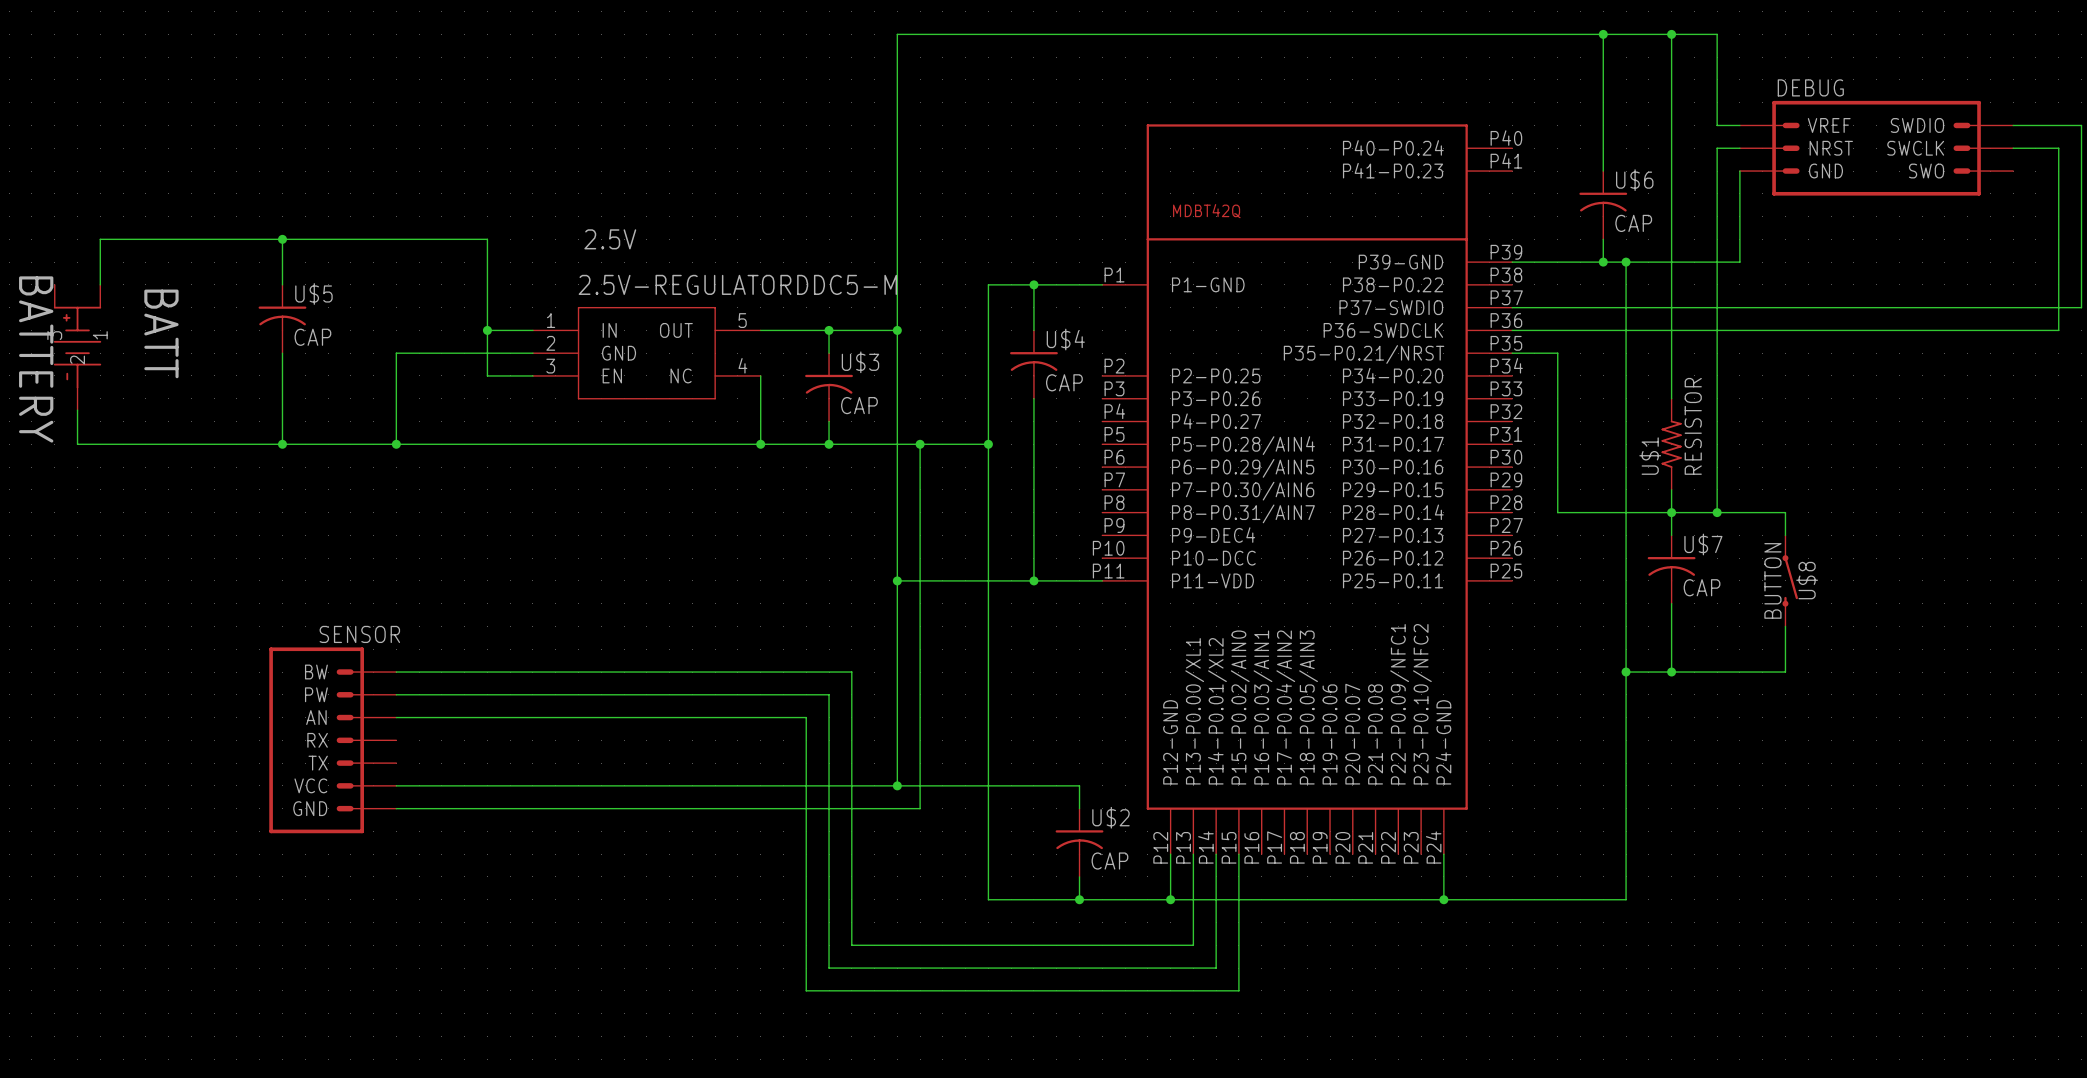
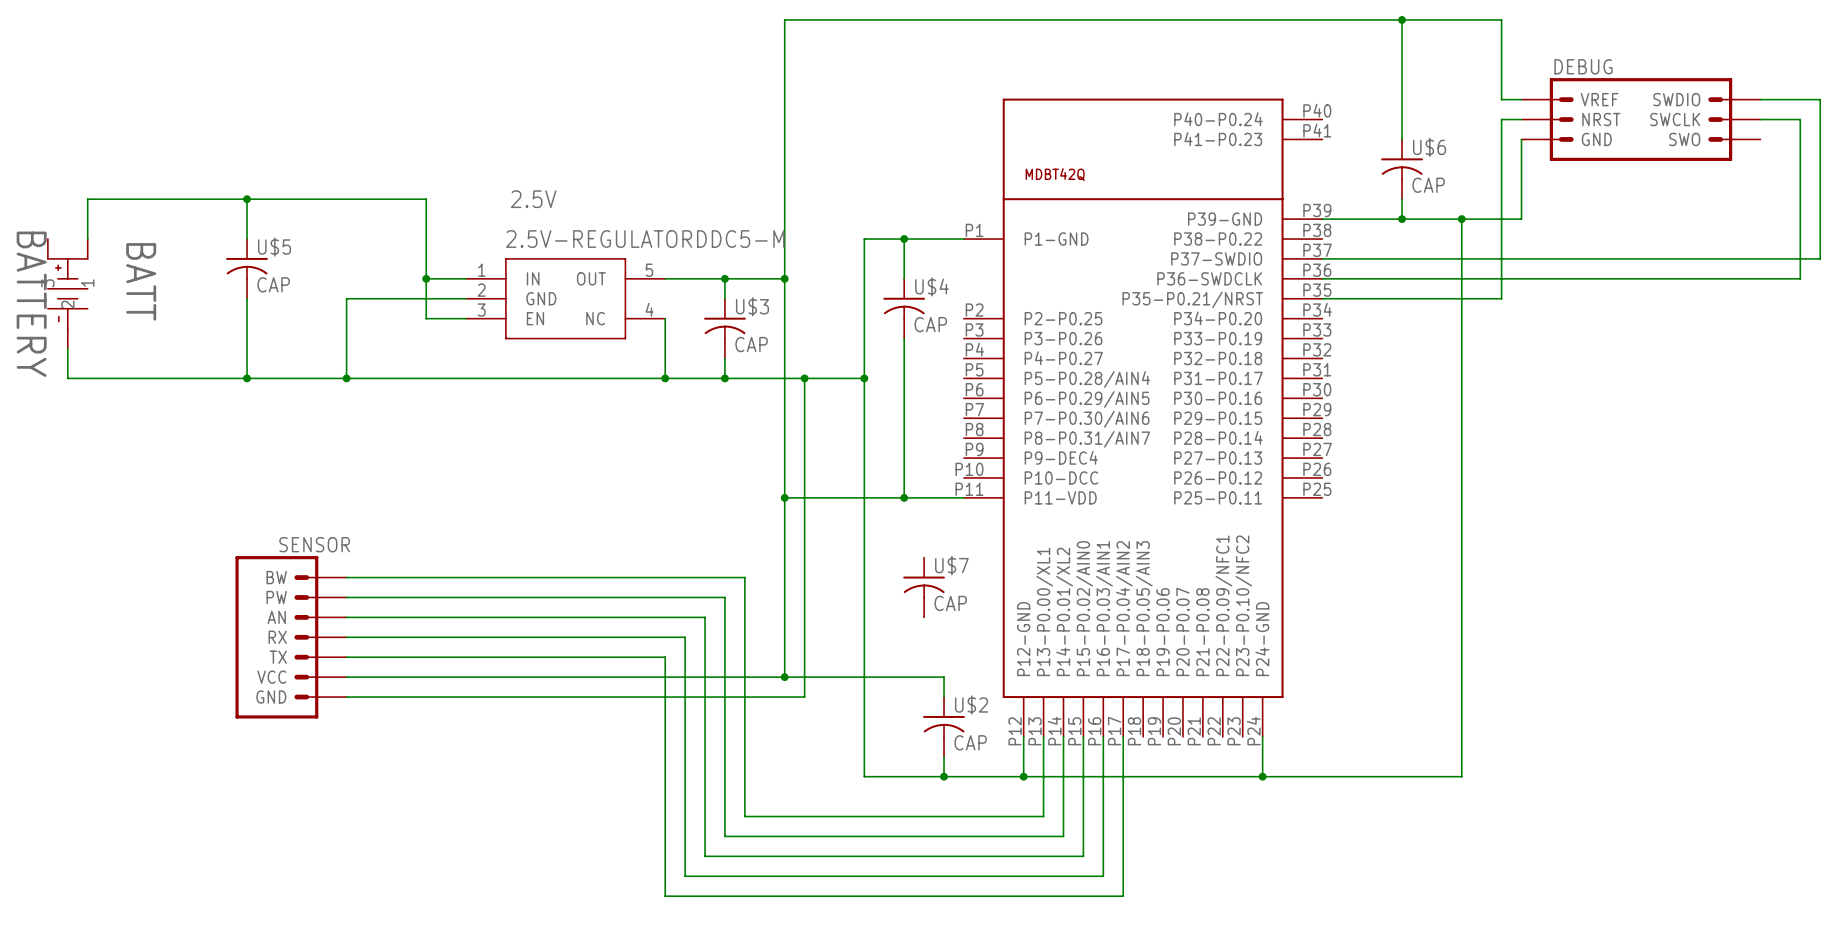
wire: (1671, 34) (1671, 262) -> none
junction: (1671, 34) -> none
wire: (1626, 262) (1626, 899) -> (1461, 577) (1461, 776) (1421, 776)
junction position: (1626, 262) -> (1461, 219)
wire: (1557, 353) (1557, 512) (1785, 512) (1785, 535) -> (1362, 298) (1501, 298)
wire: (1717, 353) (1717, 512) -> none
U$1: RESISTOR (1671, 444) -> none
junction: (1671, 512) -> none
junction: (1717, 512) -> none
U$7 position: (1671, 569) -> (924, 587)
U$8: BUTTON (1790, 580) -> none
wire: (1785, 626) (1785, 672) (1626, 672) -> none
junction: (1626, 672) -> none
junction: (1671, 672) -> none
wire: none -> (346, 637) (685, 637) (685, 876) (1103, 876) (1103, 736)
wire: none -> (346, 657) (665, 657) (665, 896) (1123, 896) (1123, 736)

